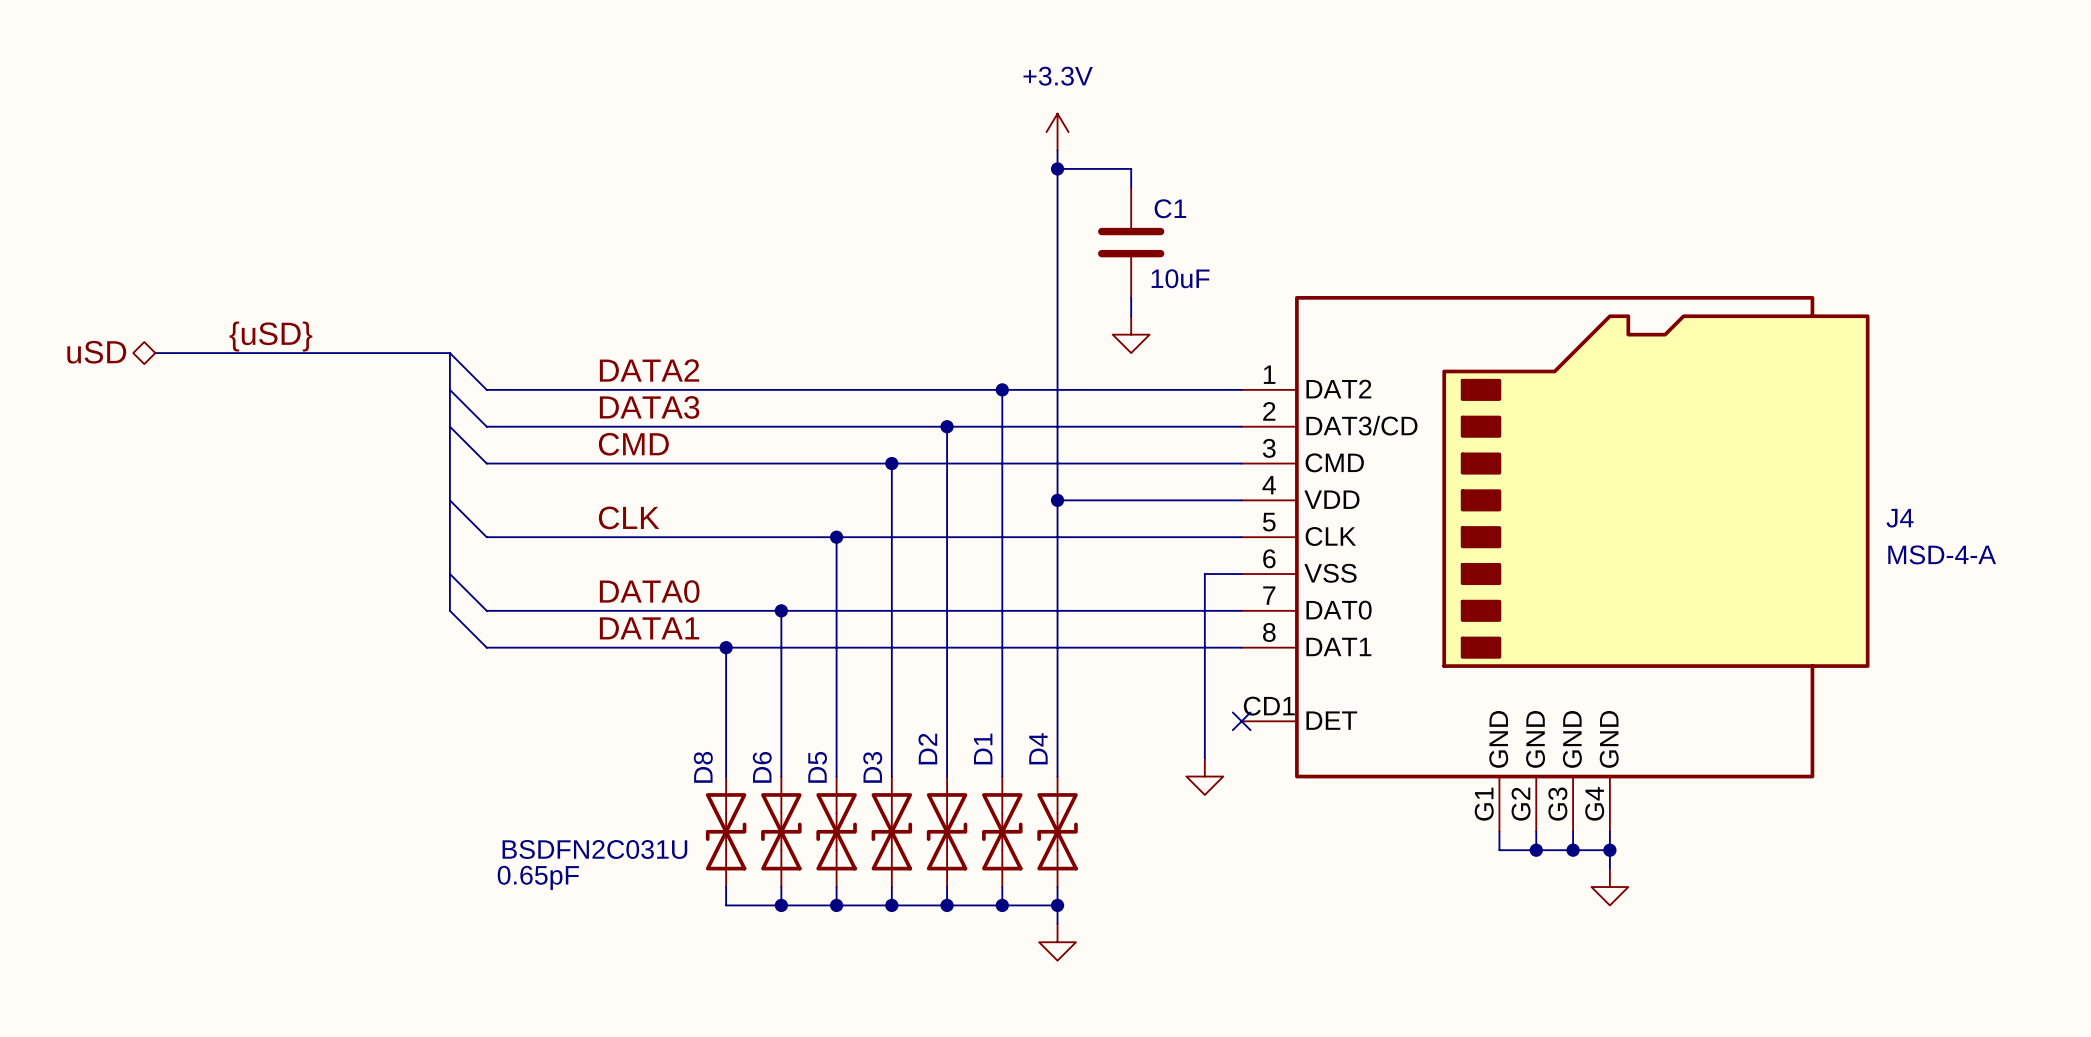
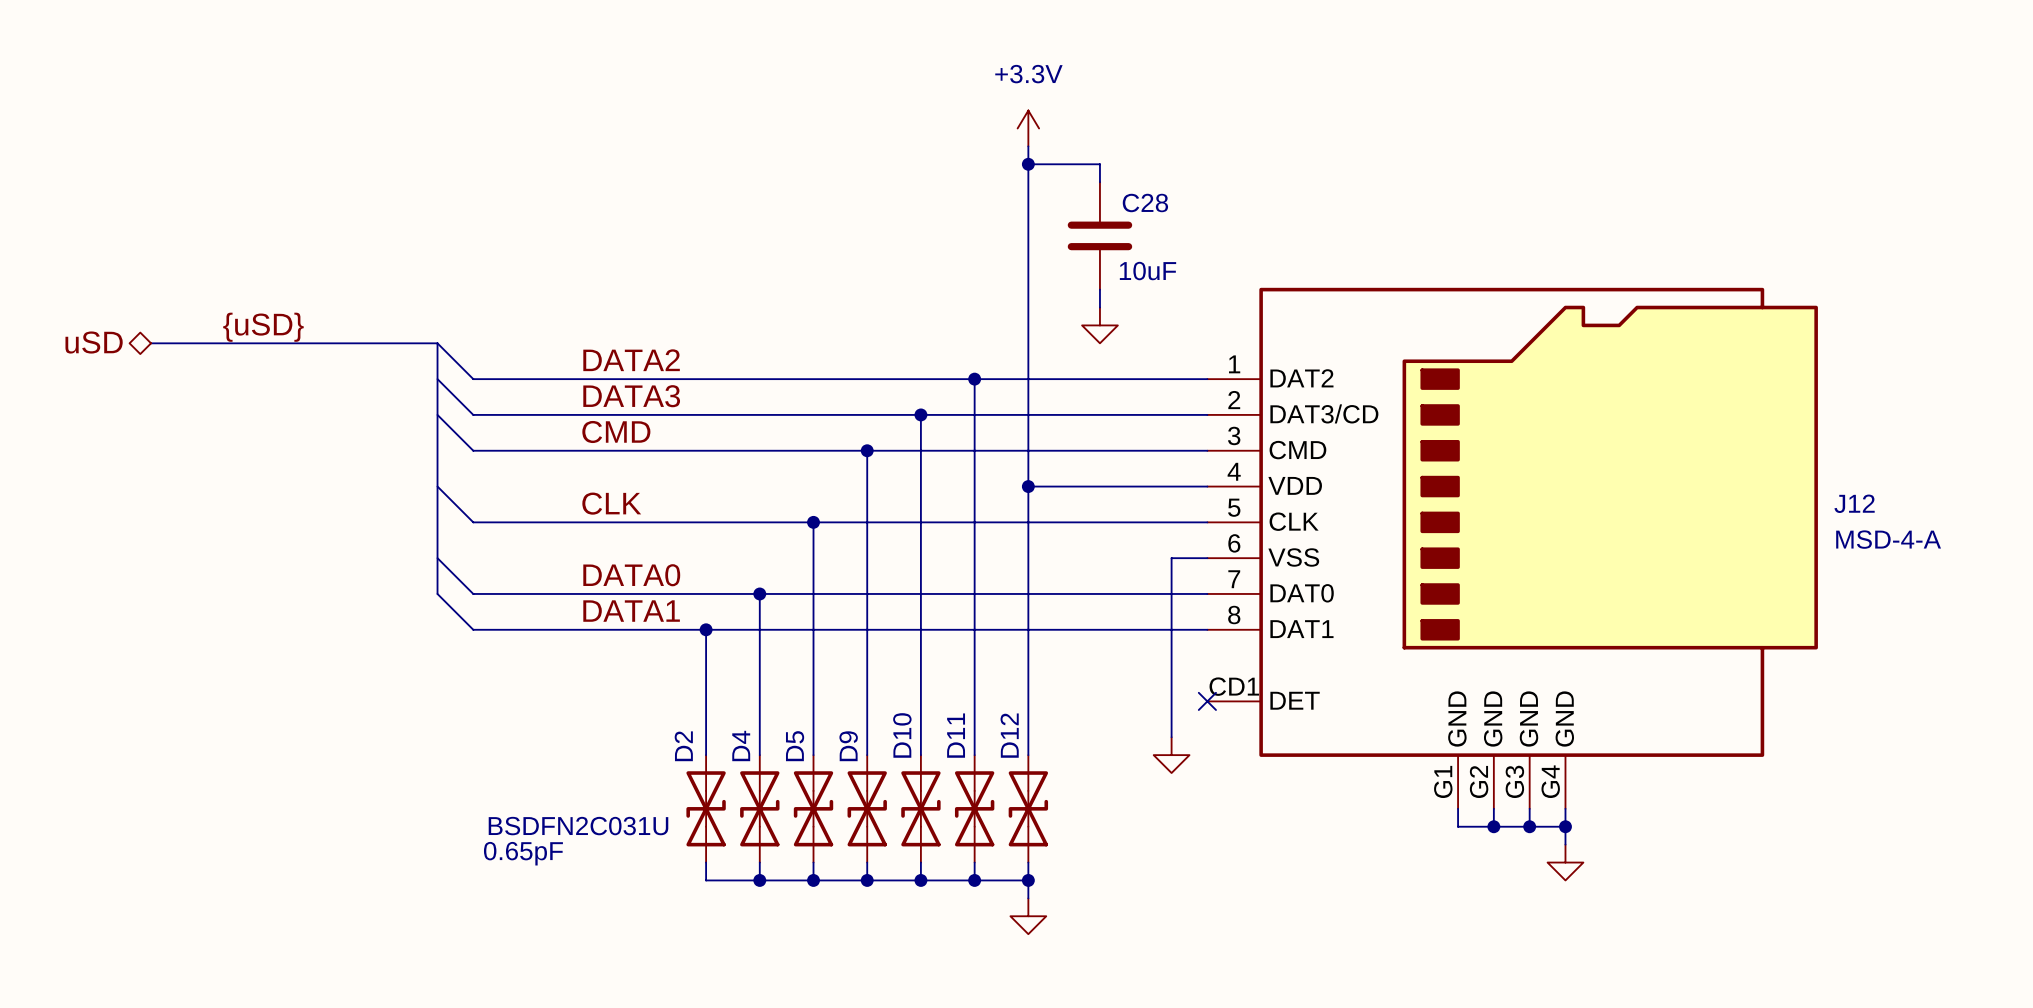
C1 name: C1 (1170, 208) -> C28 (1145, 202)
J4 name: J4 (1900, 518) -> J12 (1854, 503)
D4 name: D4 (1038, 748) -> D12 (1009, 735)
D2 name: D2 (927, 749) -> D10 (902, 735)
D1 name: D1 (983, 749) -> D11 (956, 735)
D8 name: D8 (703, 767) -> D2 (683, 746)
D6 name: D6 (762, 767) -> D4 (741, 746)
D3 name: D3 (872, 767) -> D9 (848, 746)

